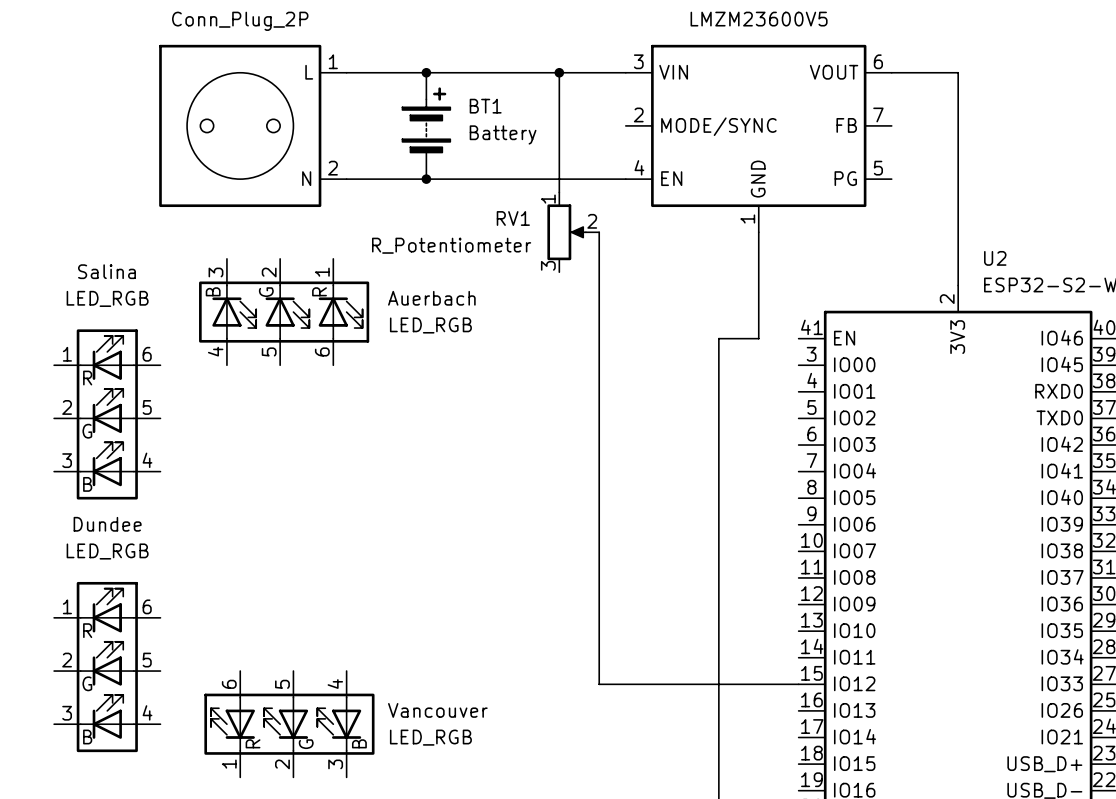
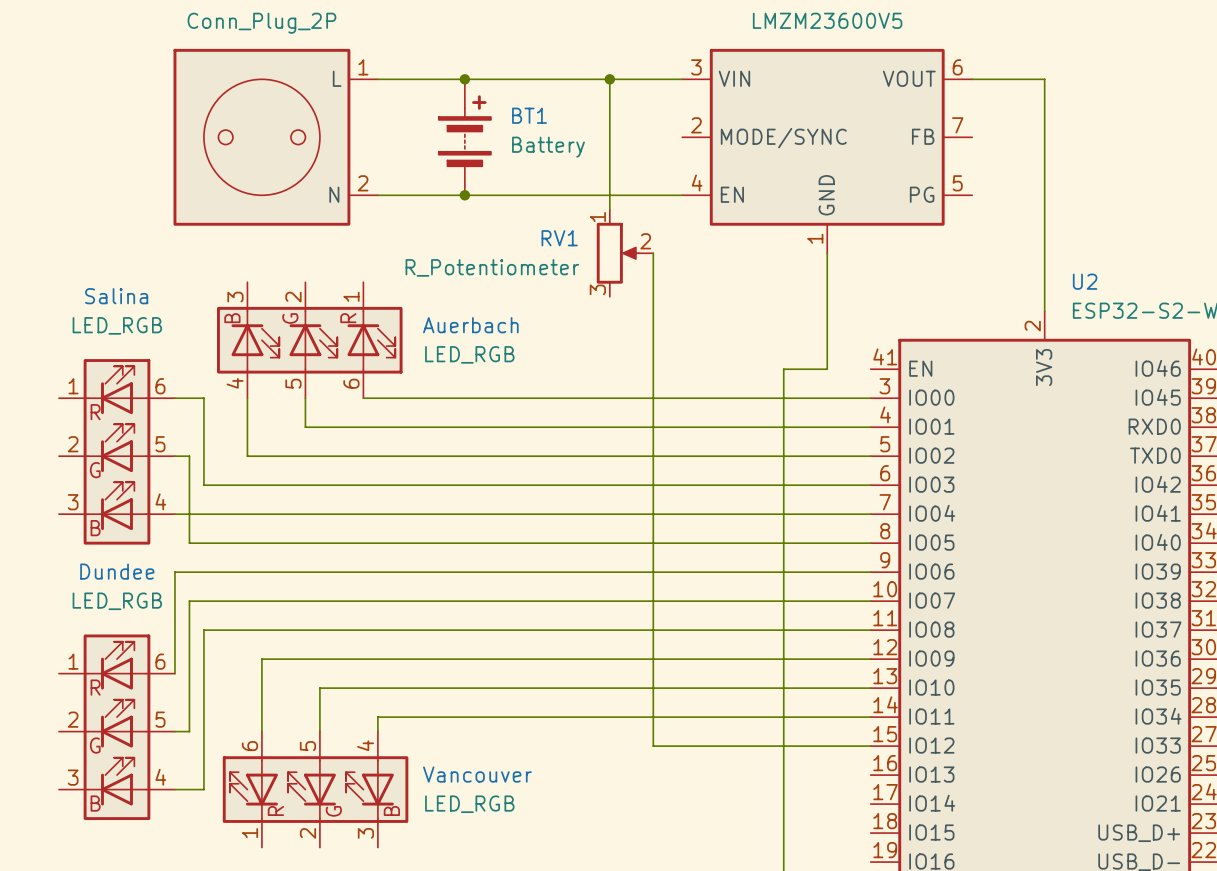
wire: none -> (174, 398) (203, 398) (203, 485) (870, 485)
wire: none -> (247, 398) (247, 456) (870, 456)
wire: none -> (305, 398) (305, 427) (870, 427)
wire: none -> (363, 398) (870, 398)
wire: none -> (174, 456) (189, 456) (189, 543) (870, 543)
wire: none -> (174, 514) (870, 514)
wire: none -> (870, 572) (174, 572) (174, 673)
wire: none -> (870, 601) (189, 601) (189, 731) (174, 731)
wire: none -> (870, 630) (203, 630) (203, 789) (174, 789)
wire: none -> (870, 659) (261, 659) (261, 731)
wire: none -> (870, 688) (319, 688) (319, 731)
wire: none -> (870, 717) (377, 717) (377, 731)

